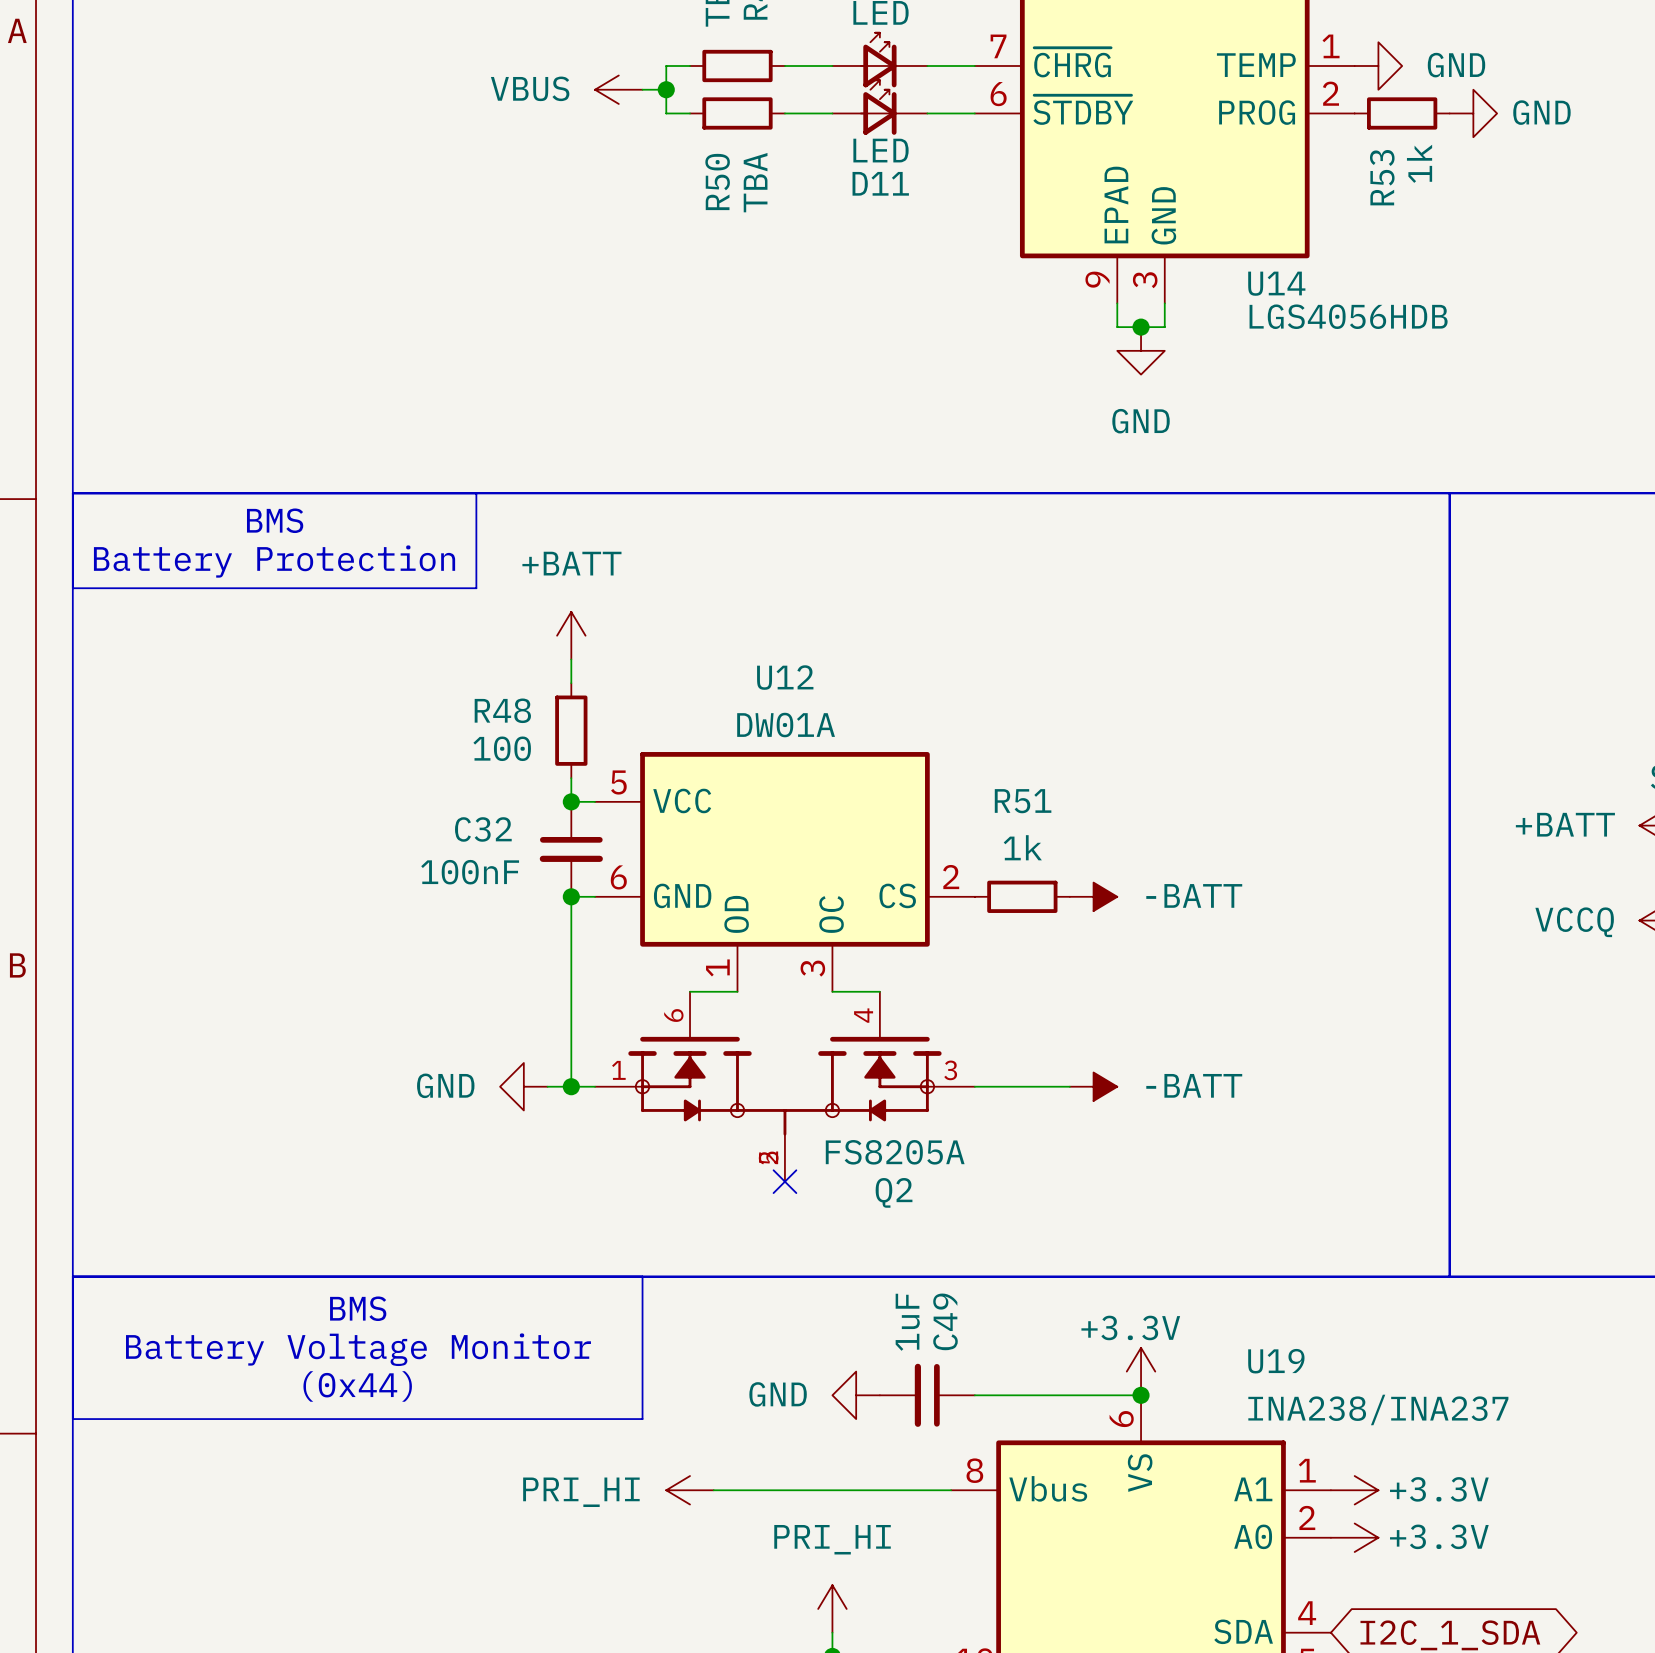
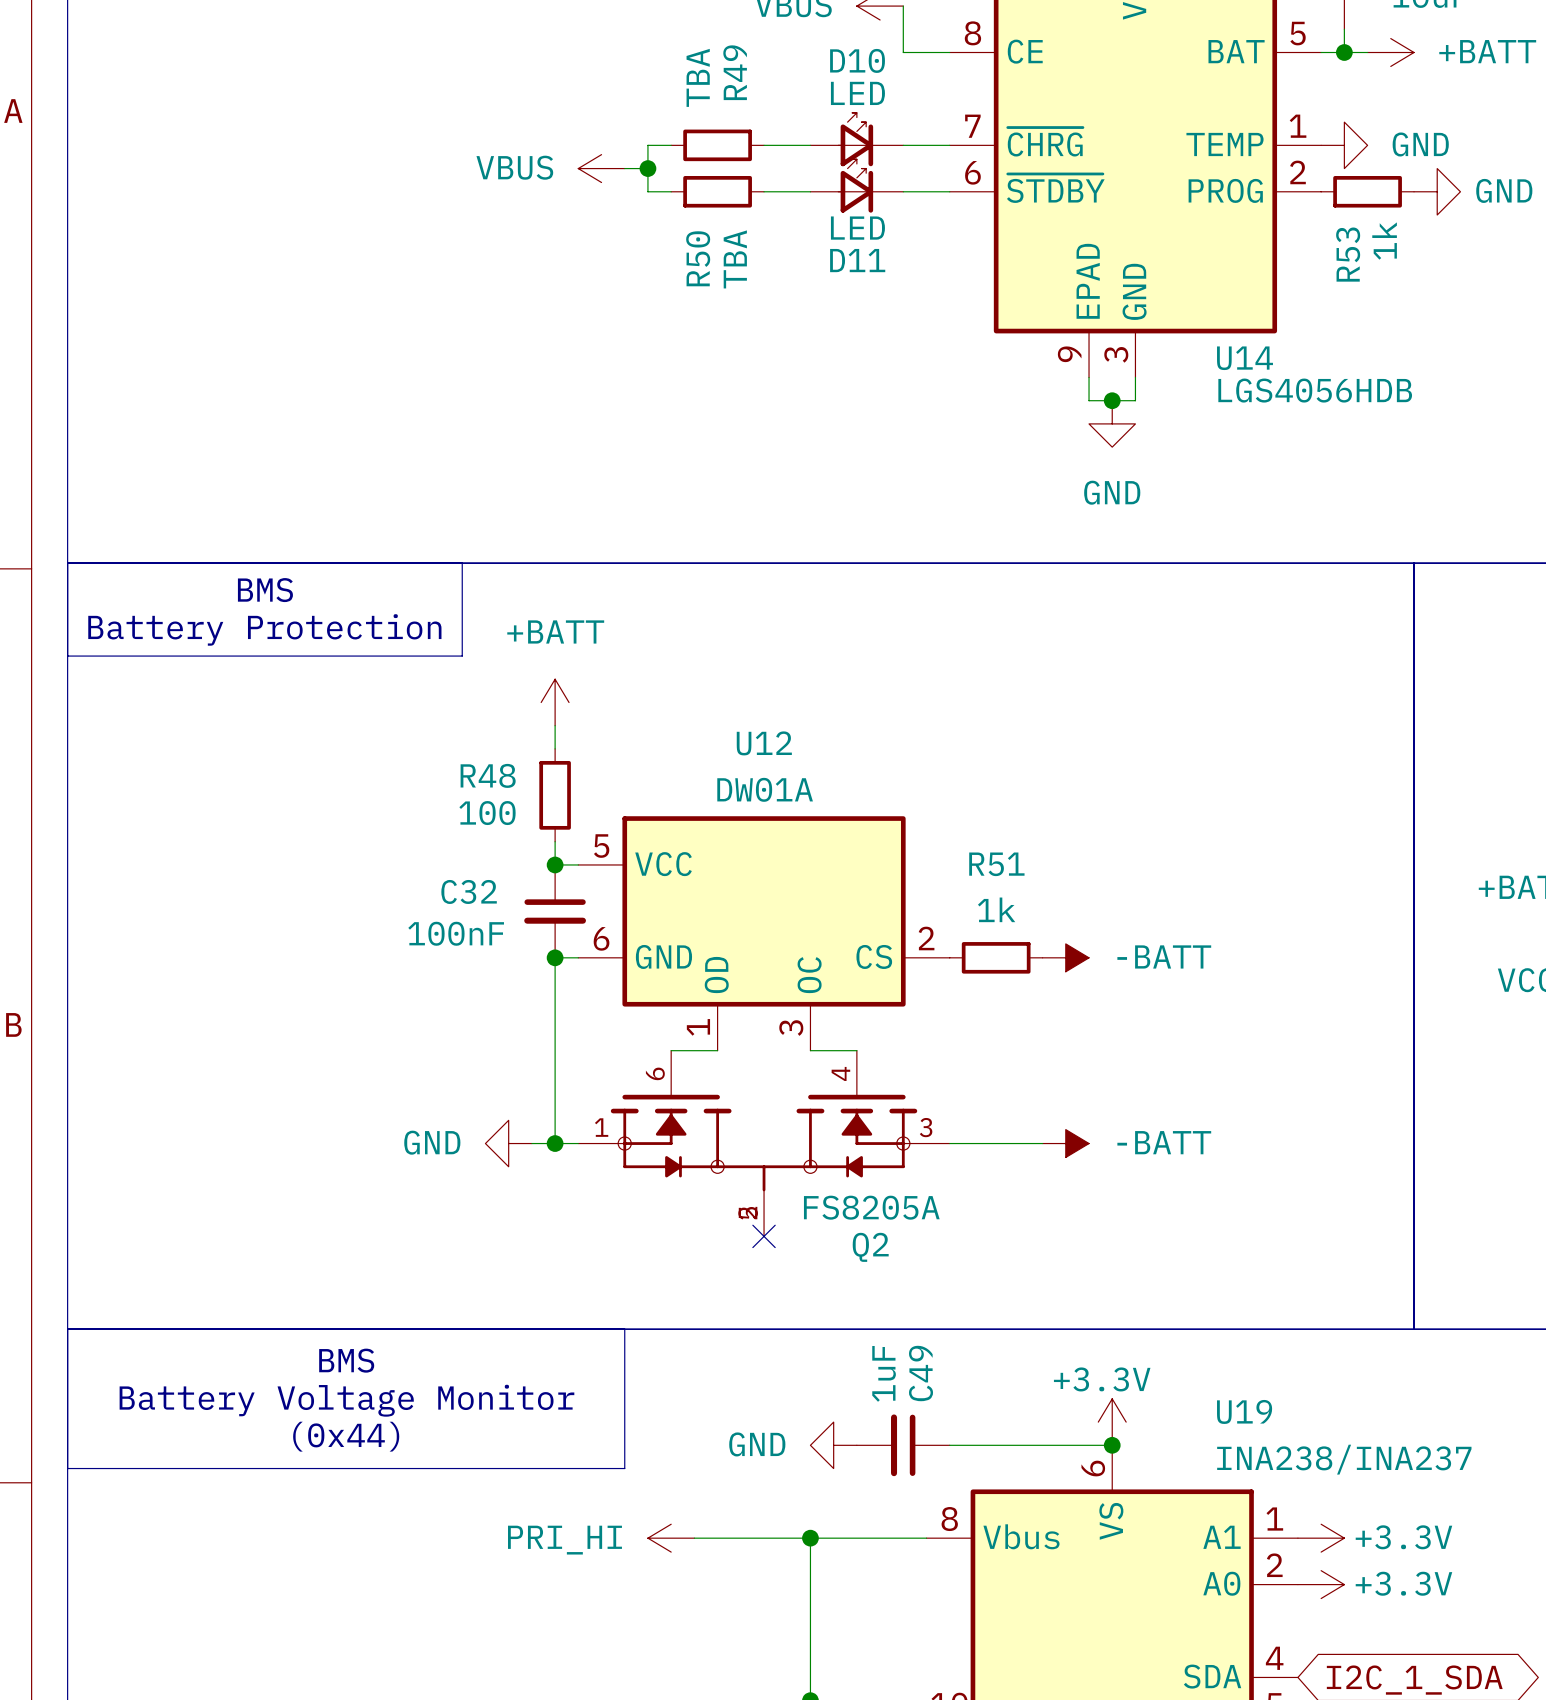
wire: none -> (810, 1538) (810, 1677)
junction: none -> (810, 1538)
power symbol: PRI_HI (832, 1608) -> none

